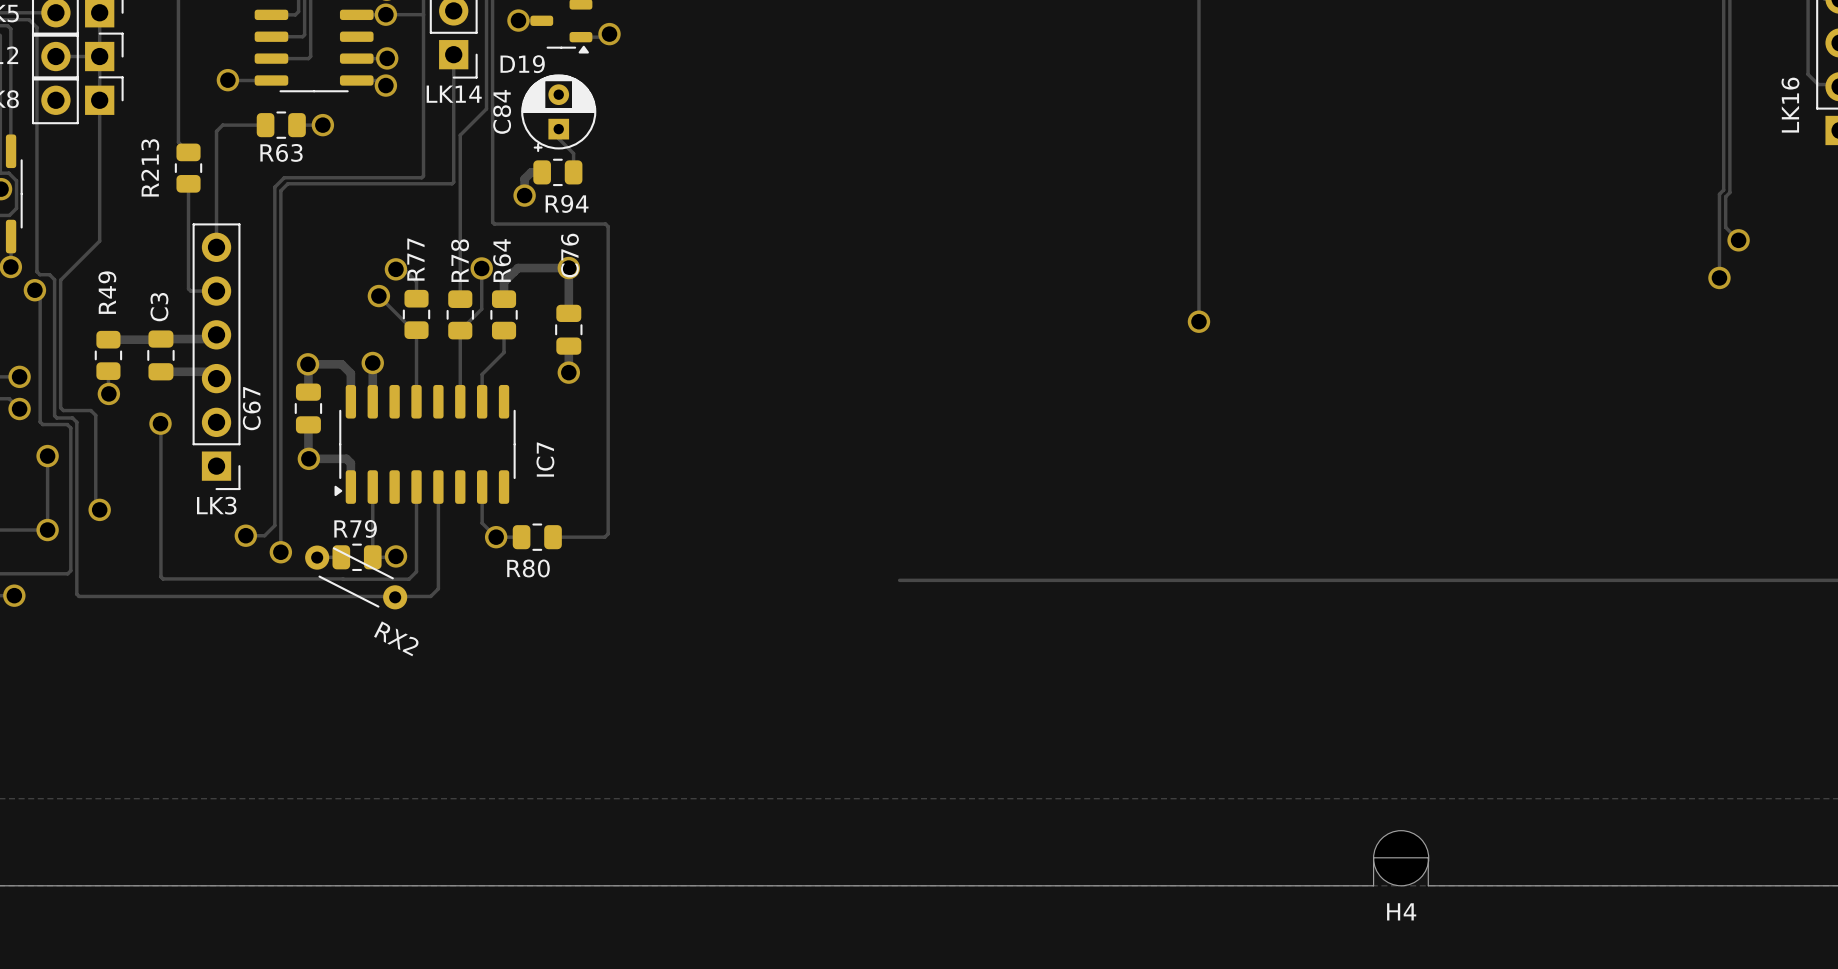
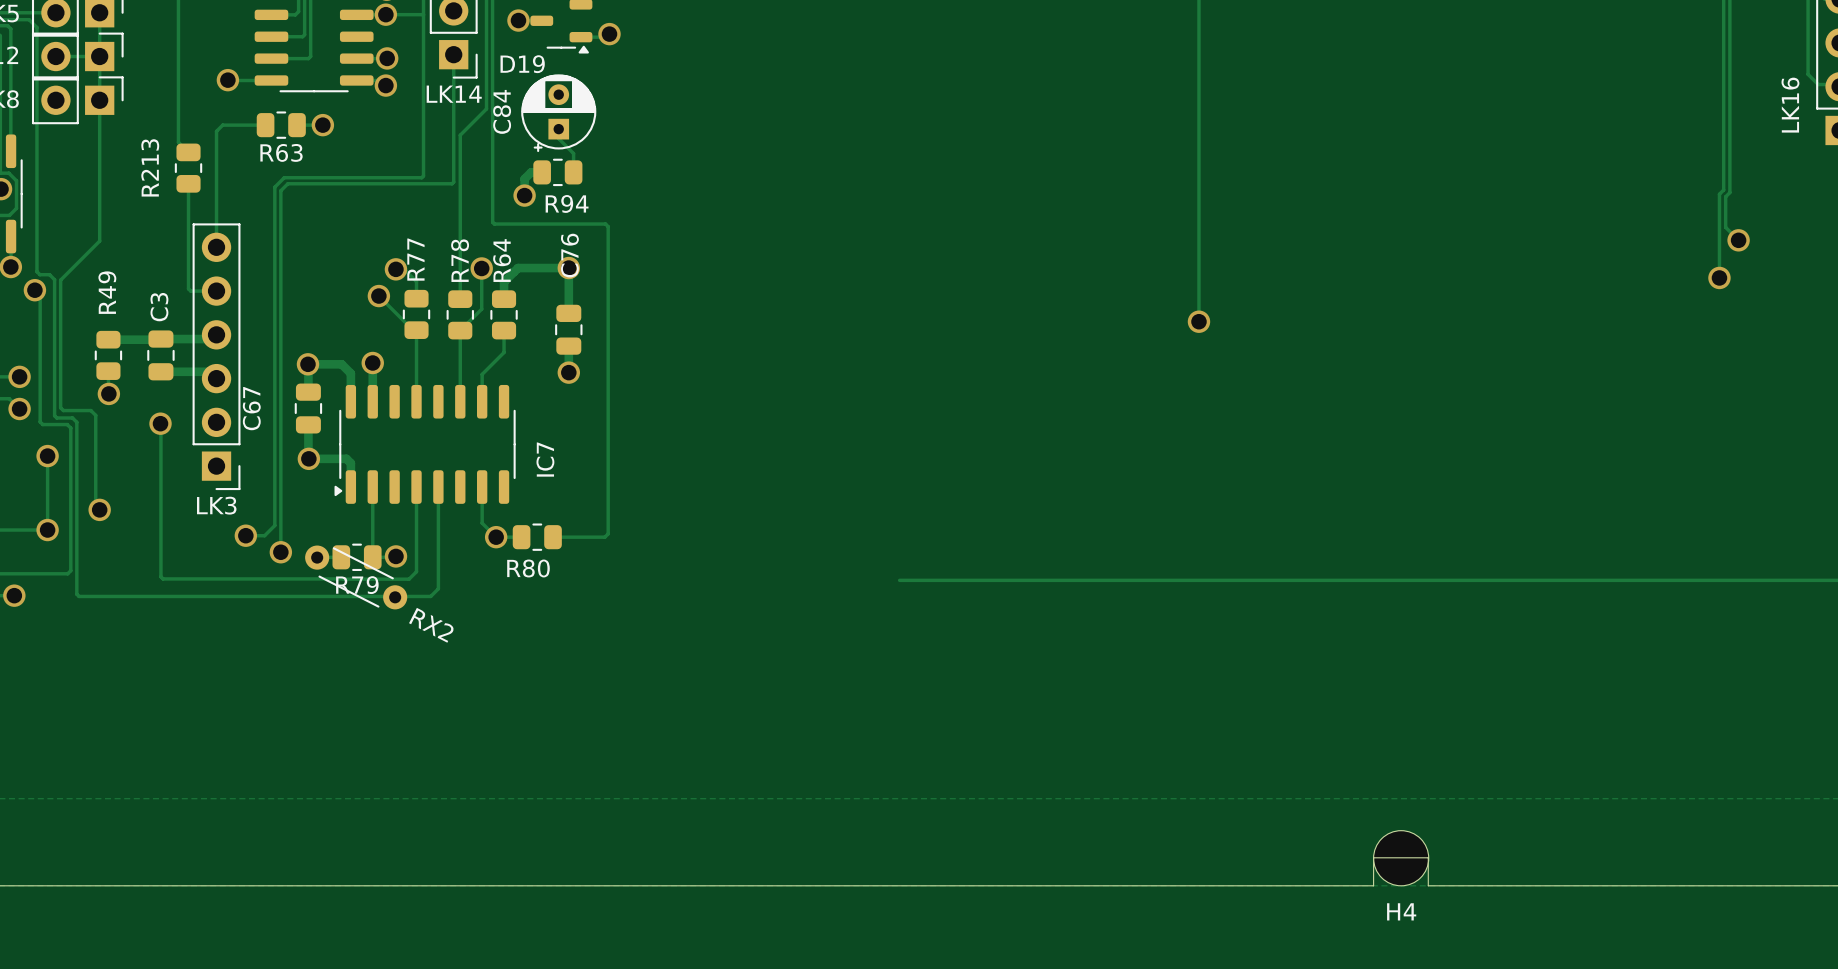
R79 name position: R79 (355, 528) -> R79 (357, 585)
RX2 name position: RX2 (396, 638) -> RX2 (431, 625)

